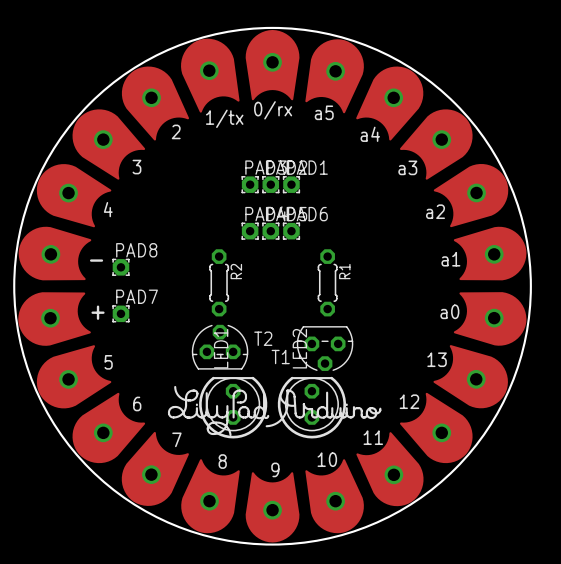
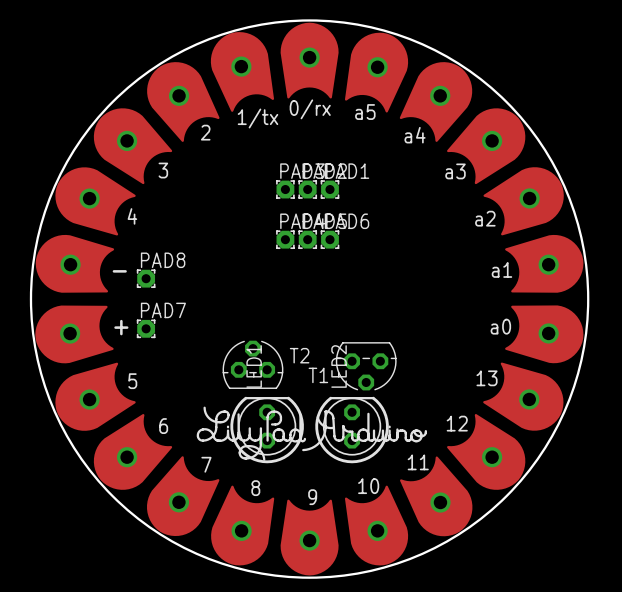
R2: (219, 282) -> none
R1: (327, 282) -> none

